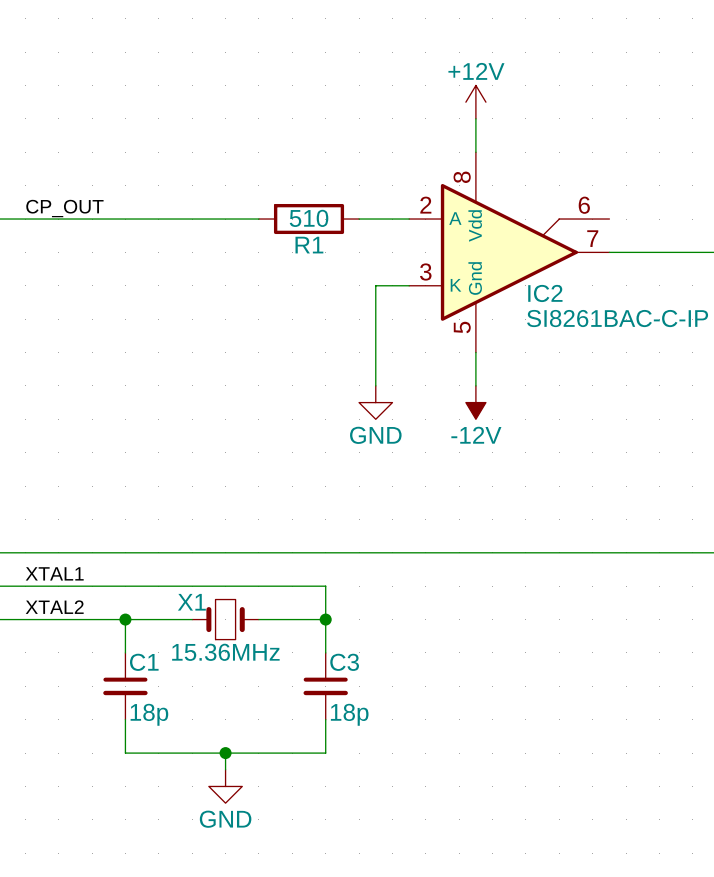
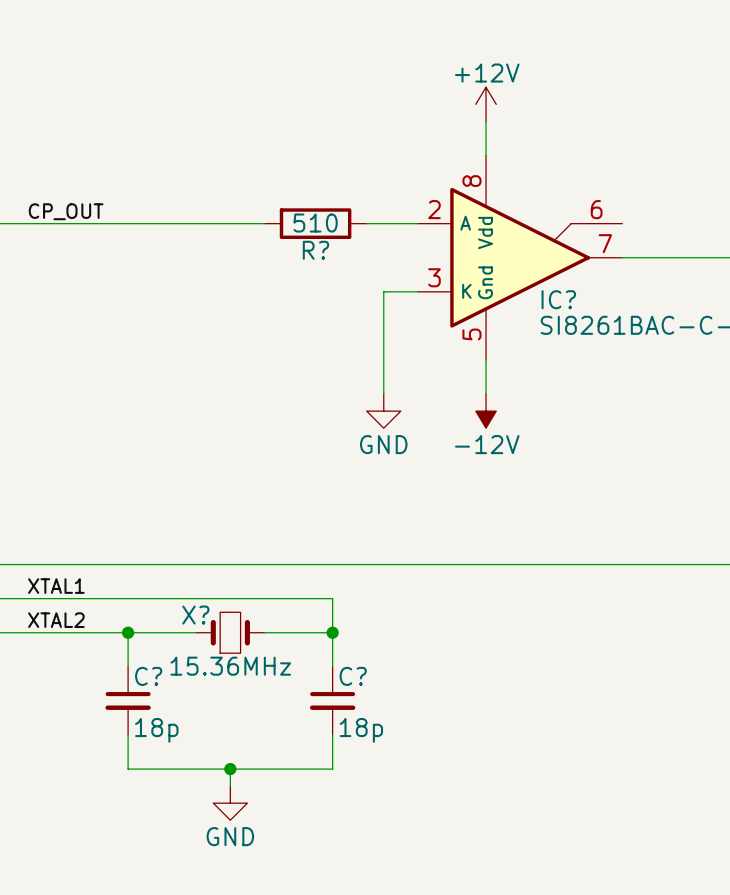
R1 name: R1 (309, 245) -> R? (315, 250)
IC2 name: IC2 (545, 293) -> IC? (558, 299)
X1 name: X1 (191, 602) -> X? (195, 615)
C1 name: C1 (144, 662) -> C? (148, 676)
C3 name: C3 (344, 662) -> C? (353, 676)

